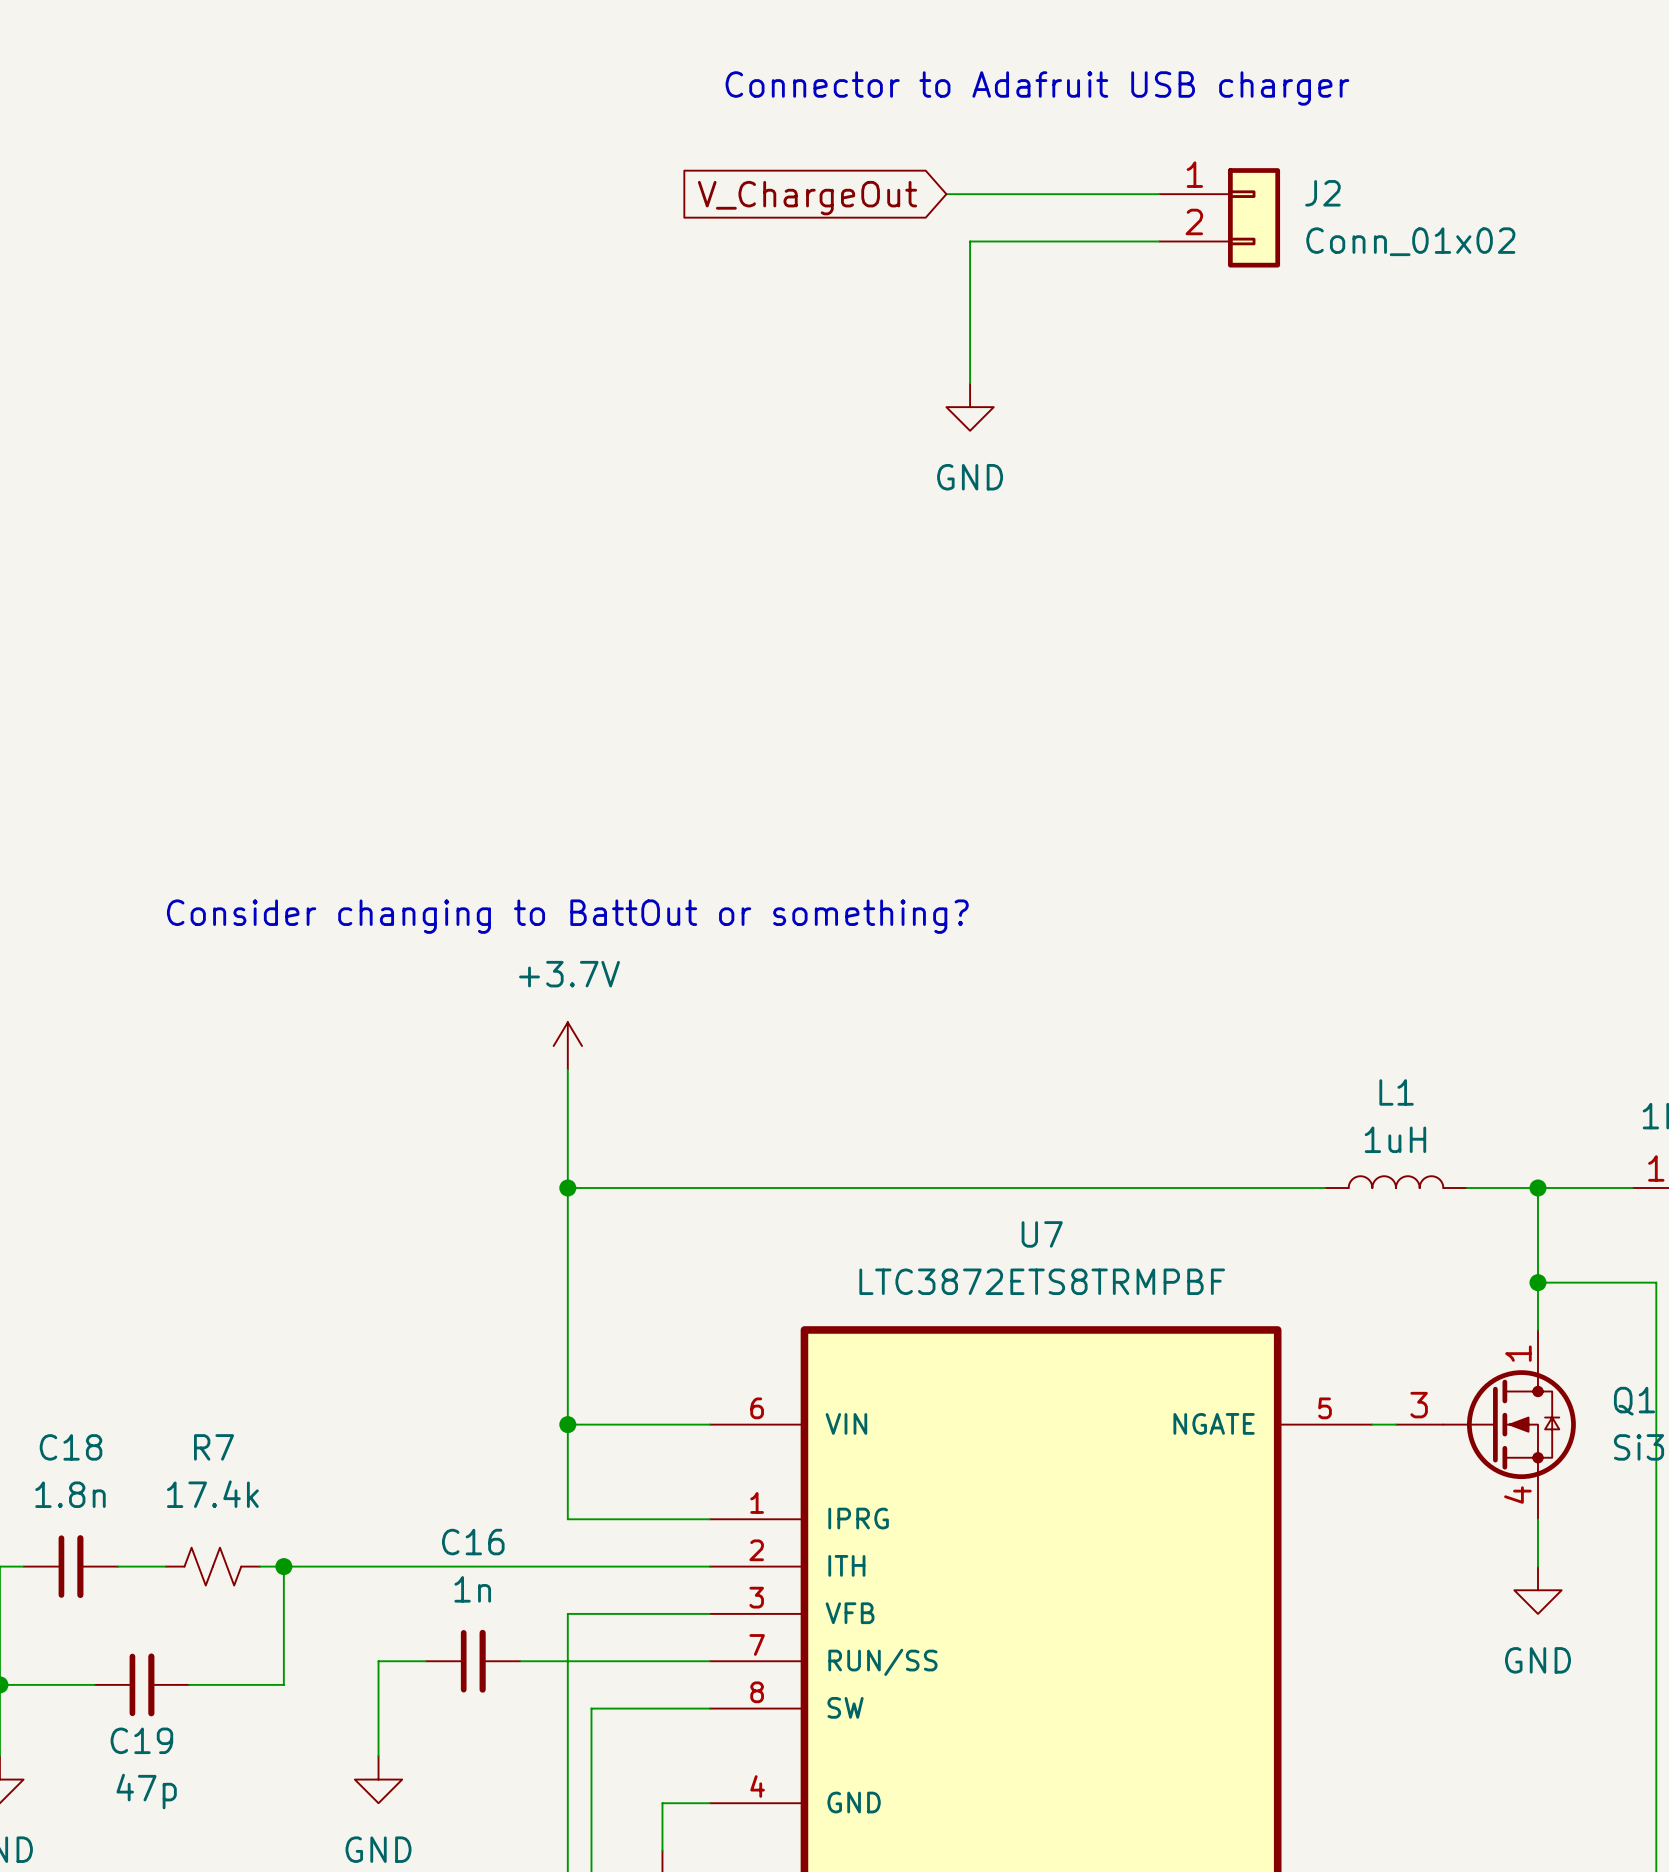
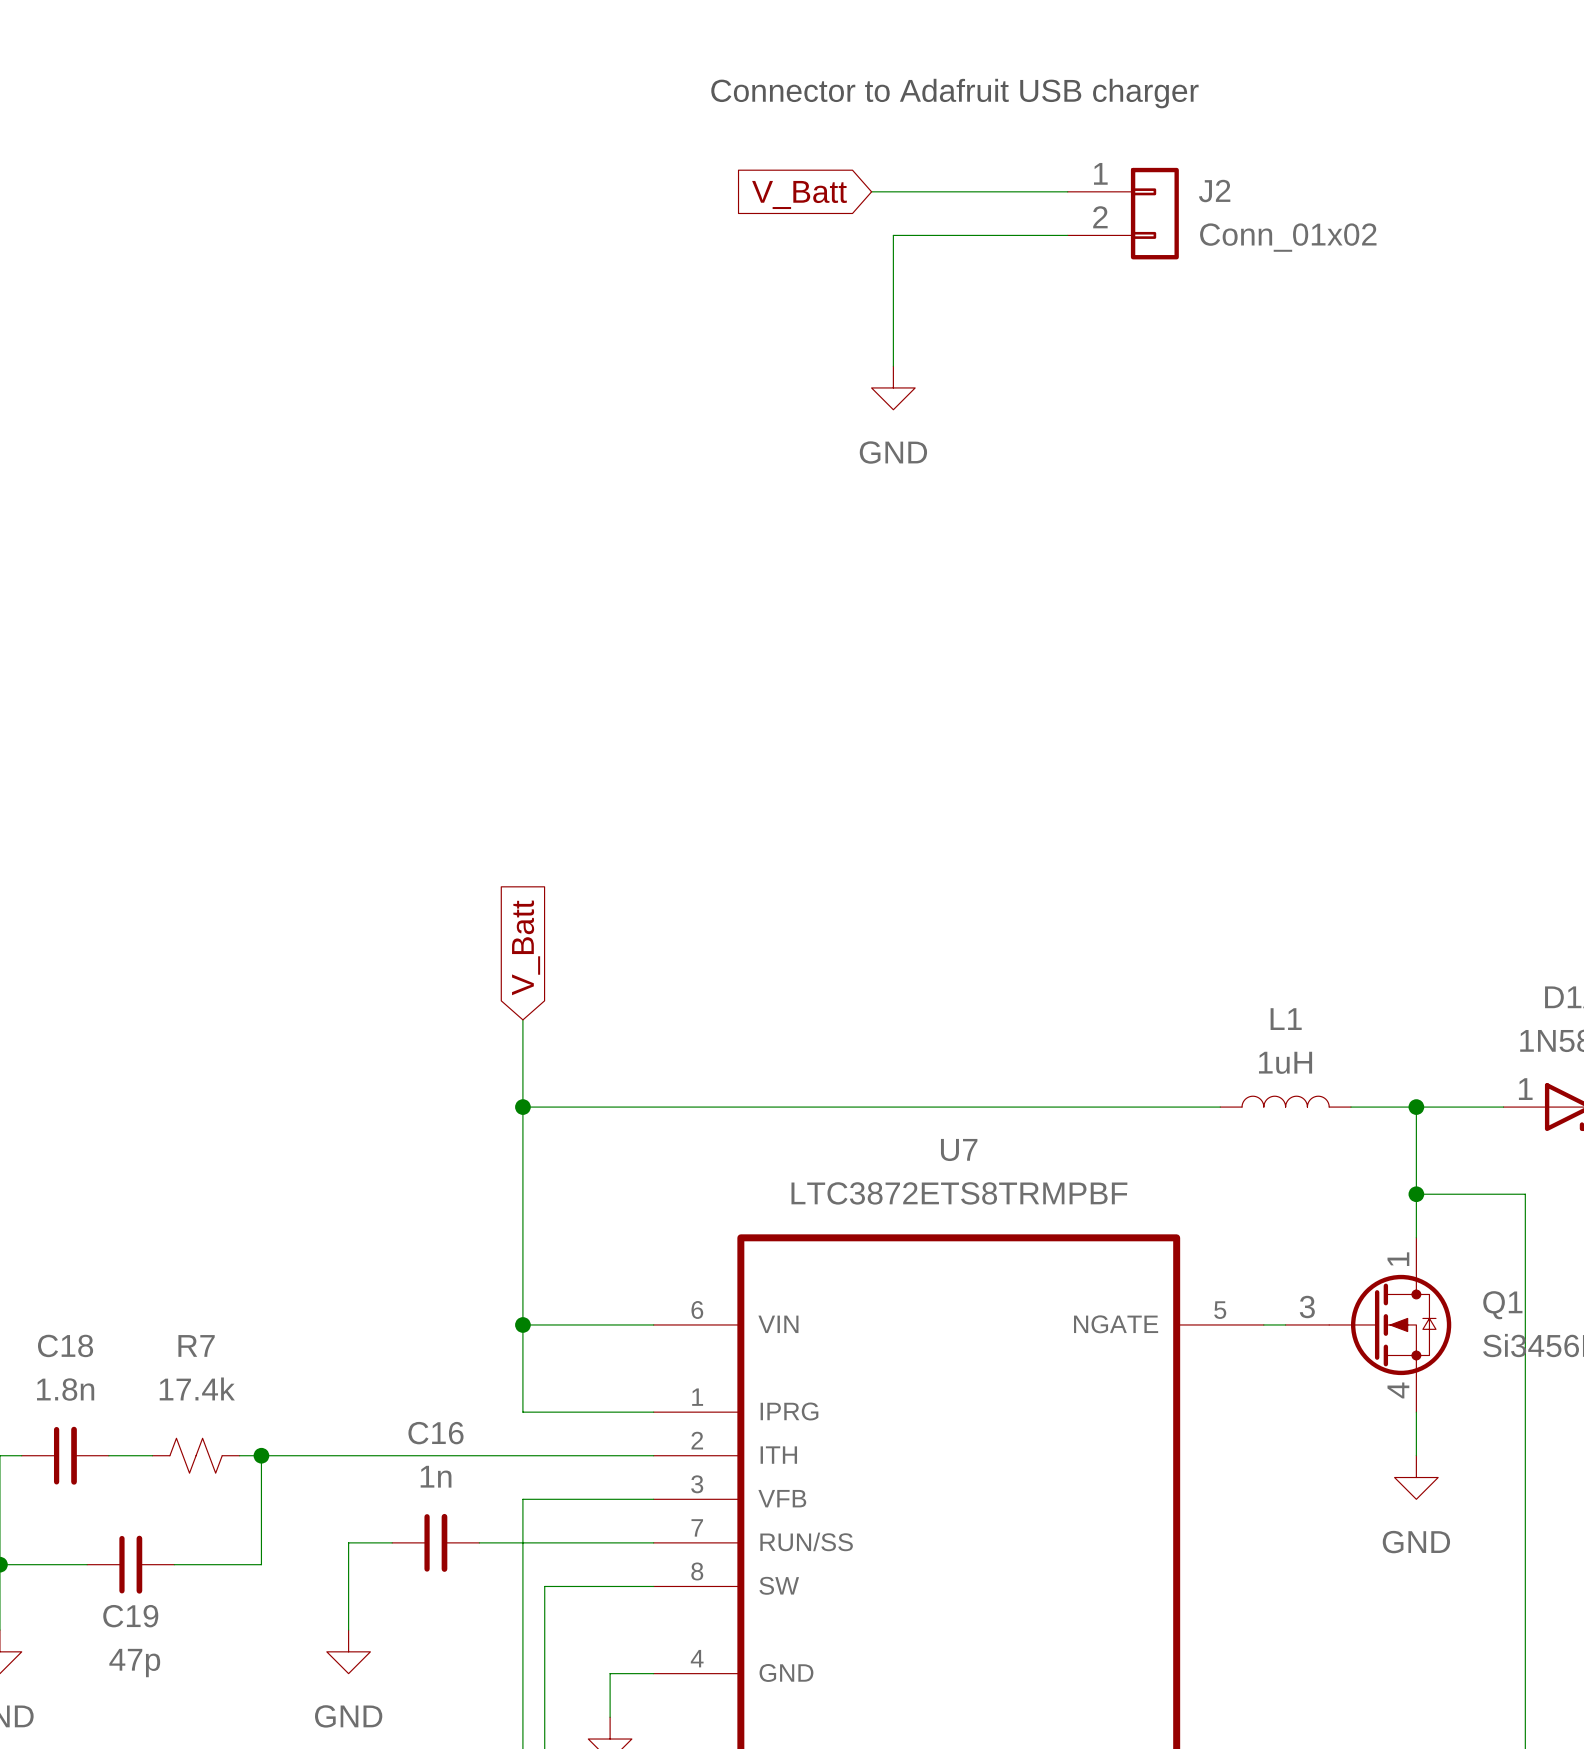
global label: V_ChargeOut (807, 198) -> V_Batt (799, 194)
text: Consider changing to BattOut or something? (567, 916) -> none
global label: none -> V_Batt (526, 947)
power symbol: +3.7V (567, 1046) -> none
wire: (567, 1069) (567, 1093) -> none

